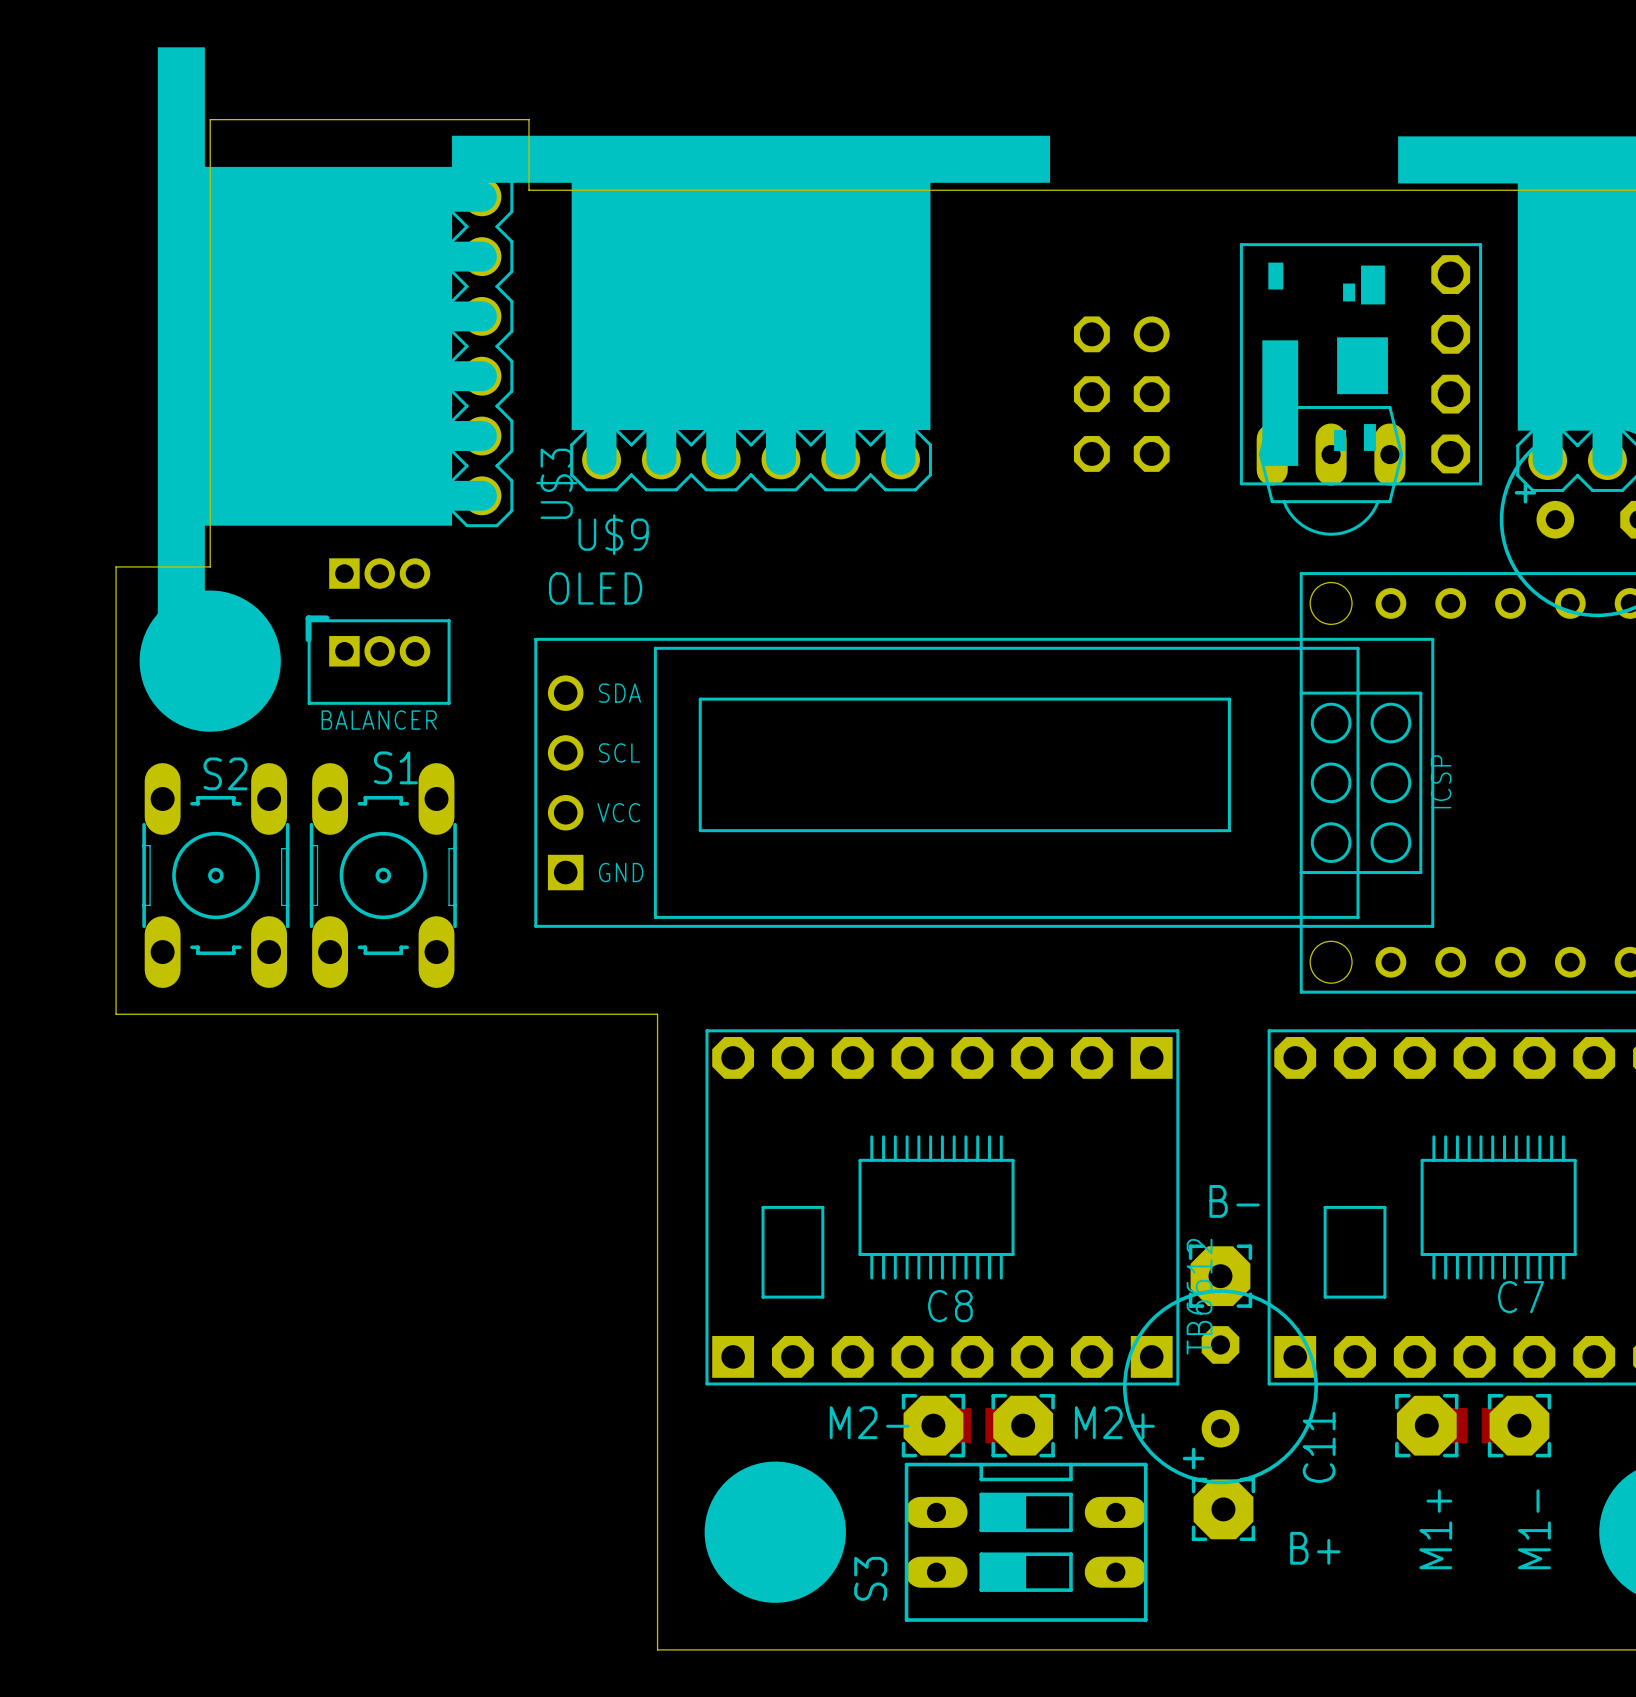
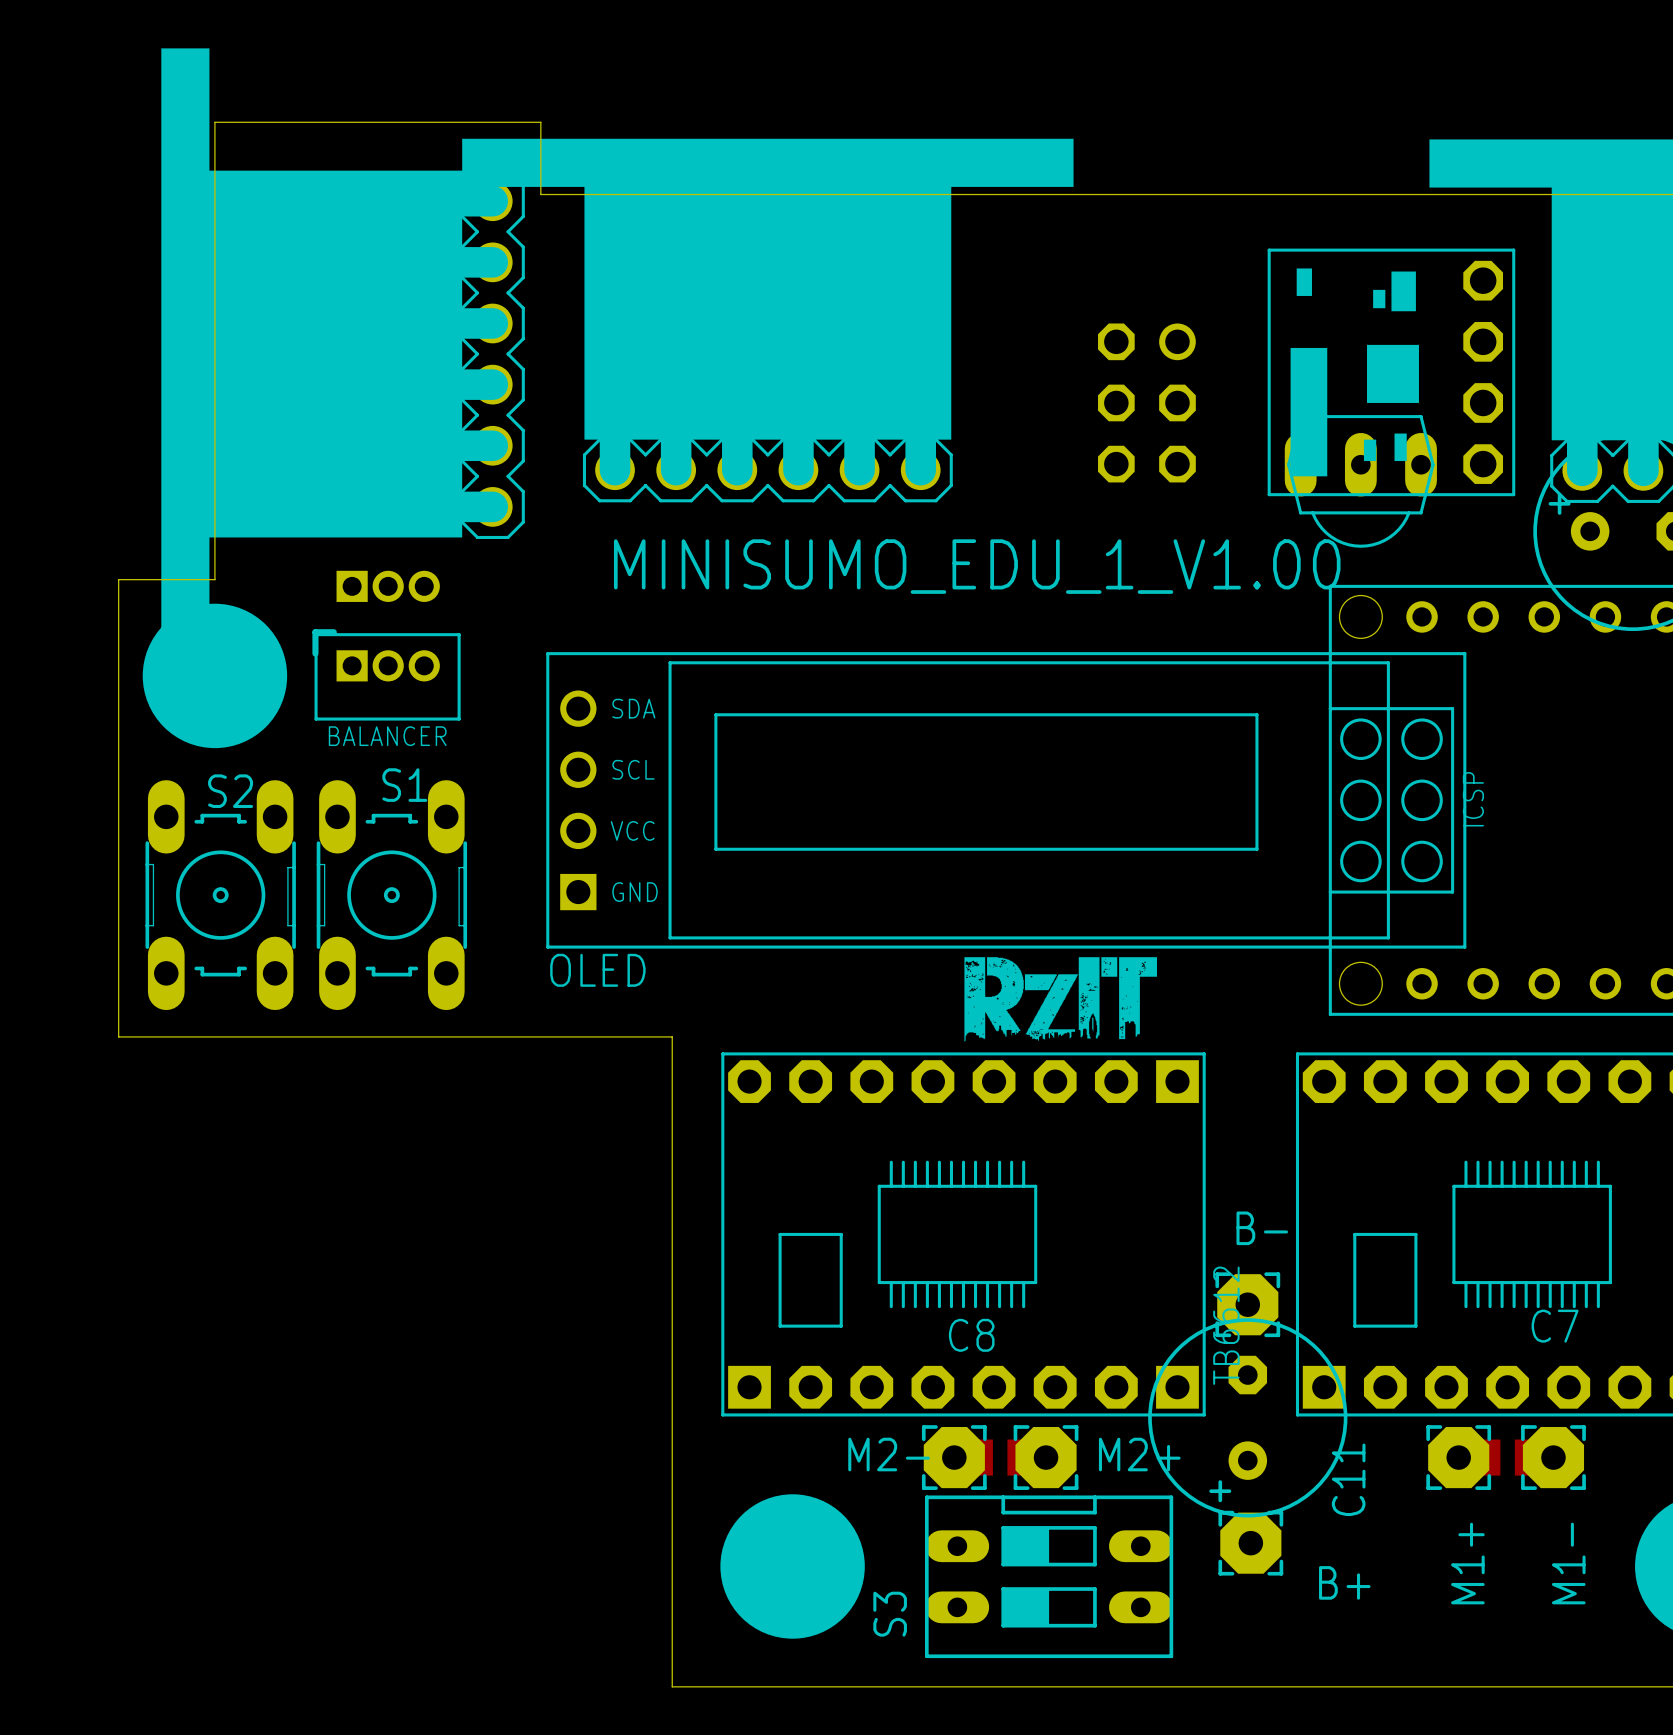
U$3 name: U$3 (556, 483) -> none
U$9 name: U$9 (613, 534) -> none
text: none -> MINISUMO_EDU_1_V1.00 (977, 566)
OLED name position: OLED (595, 588) -> OLED (597, 970)
drawing: none -> [964, 957, 1158, 1042]

